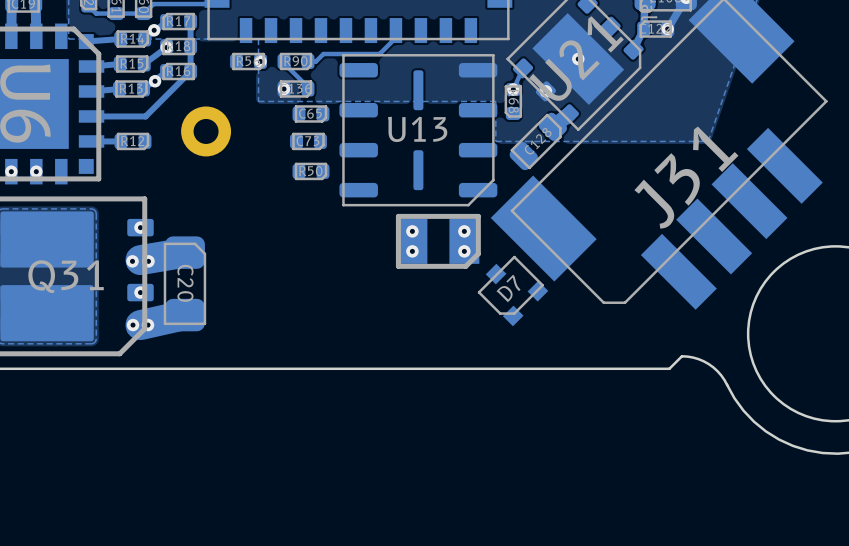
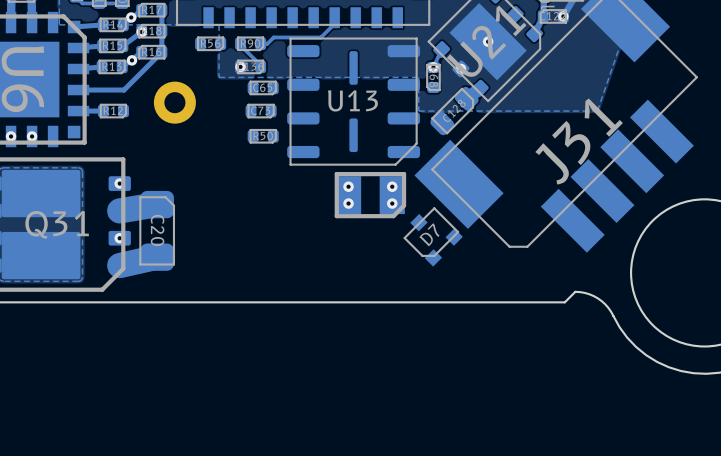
via: (260, 61) -> none
via: (132, 261) -> none
via: (148, 261) -> none
via: (133, 325) -> none
via: (147, 325) -> none

